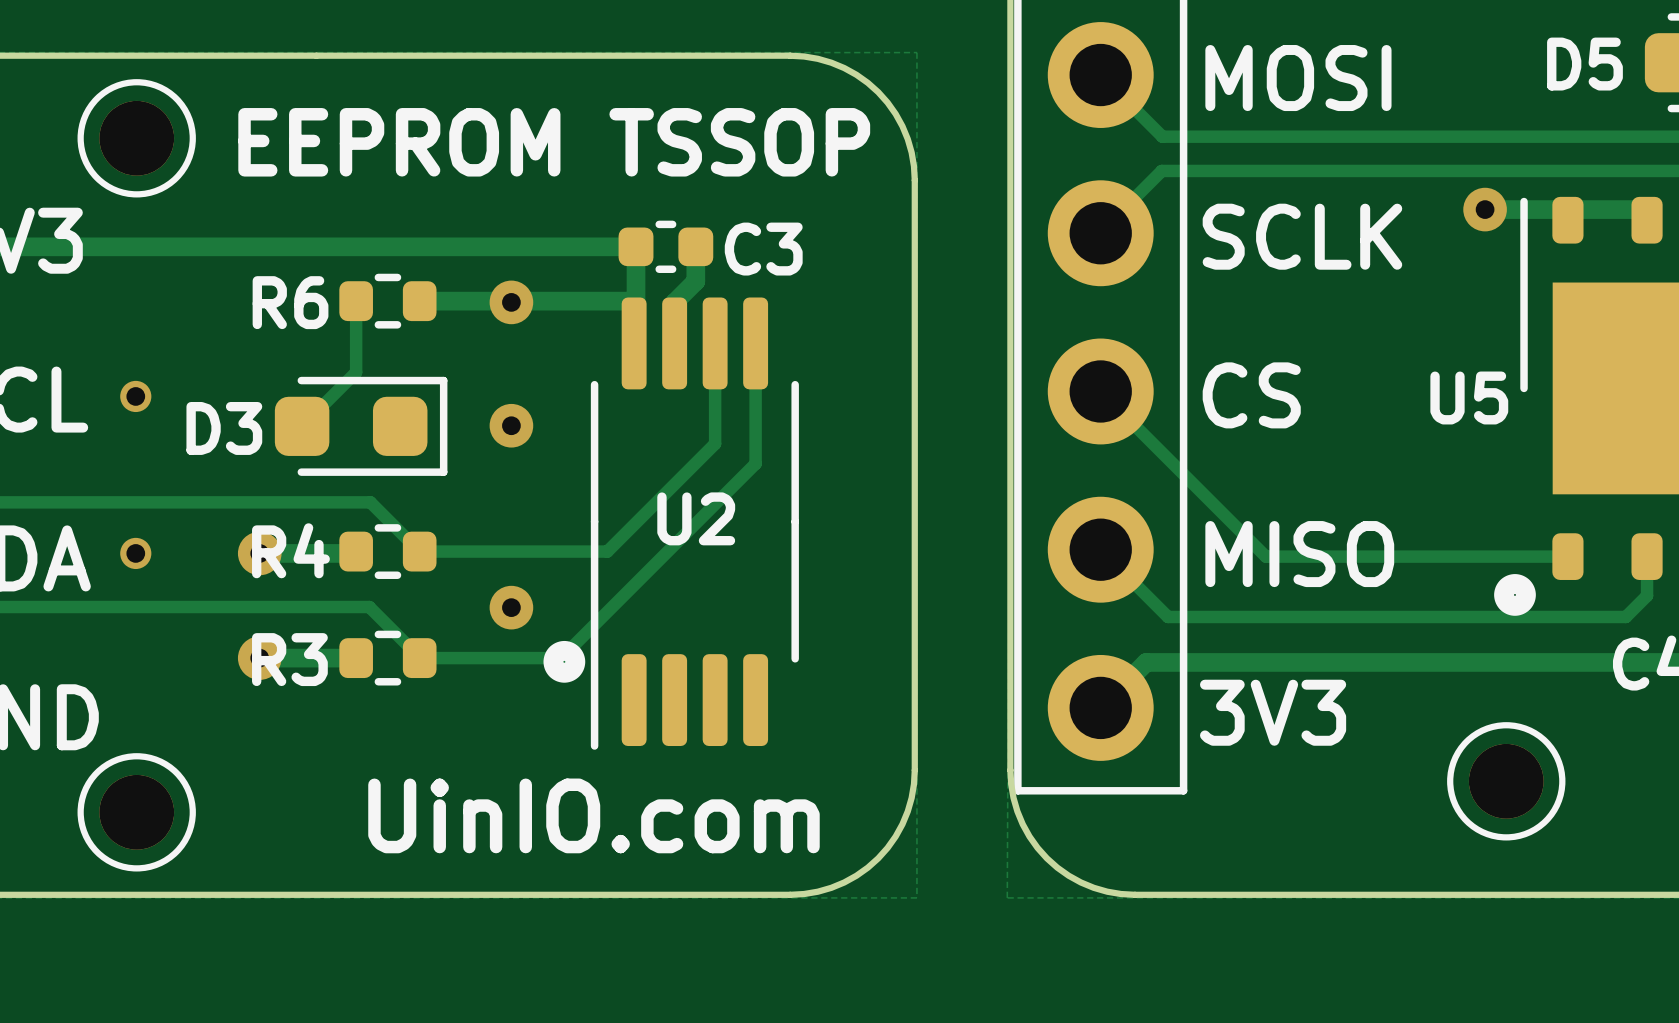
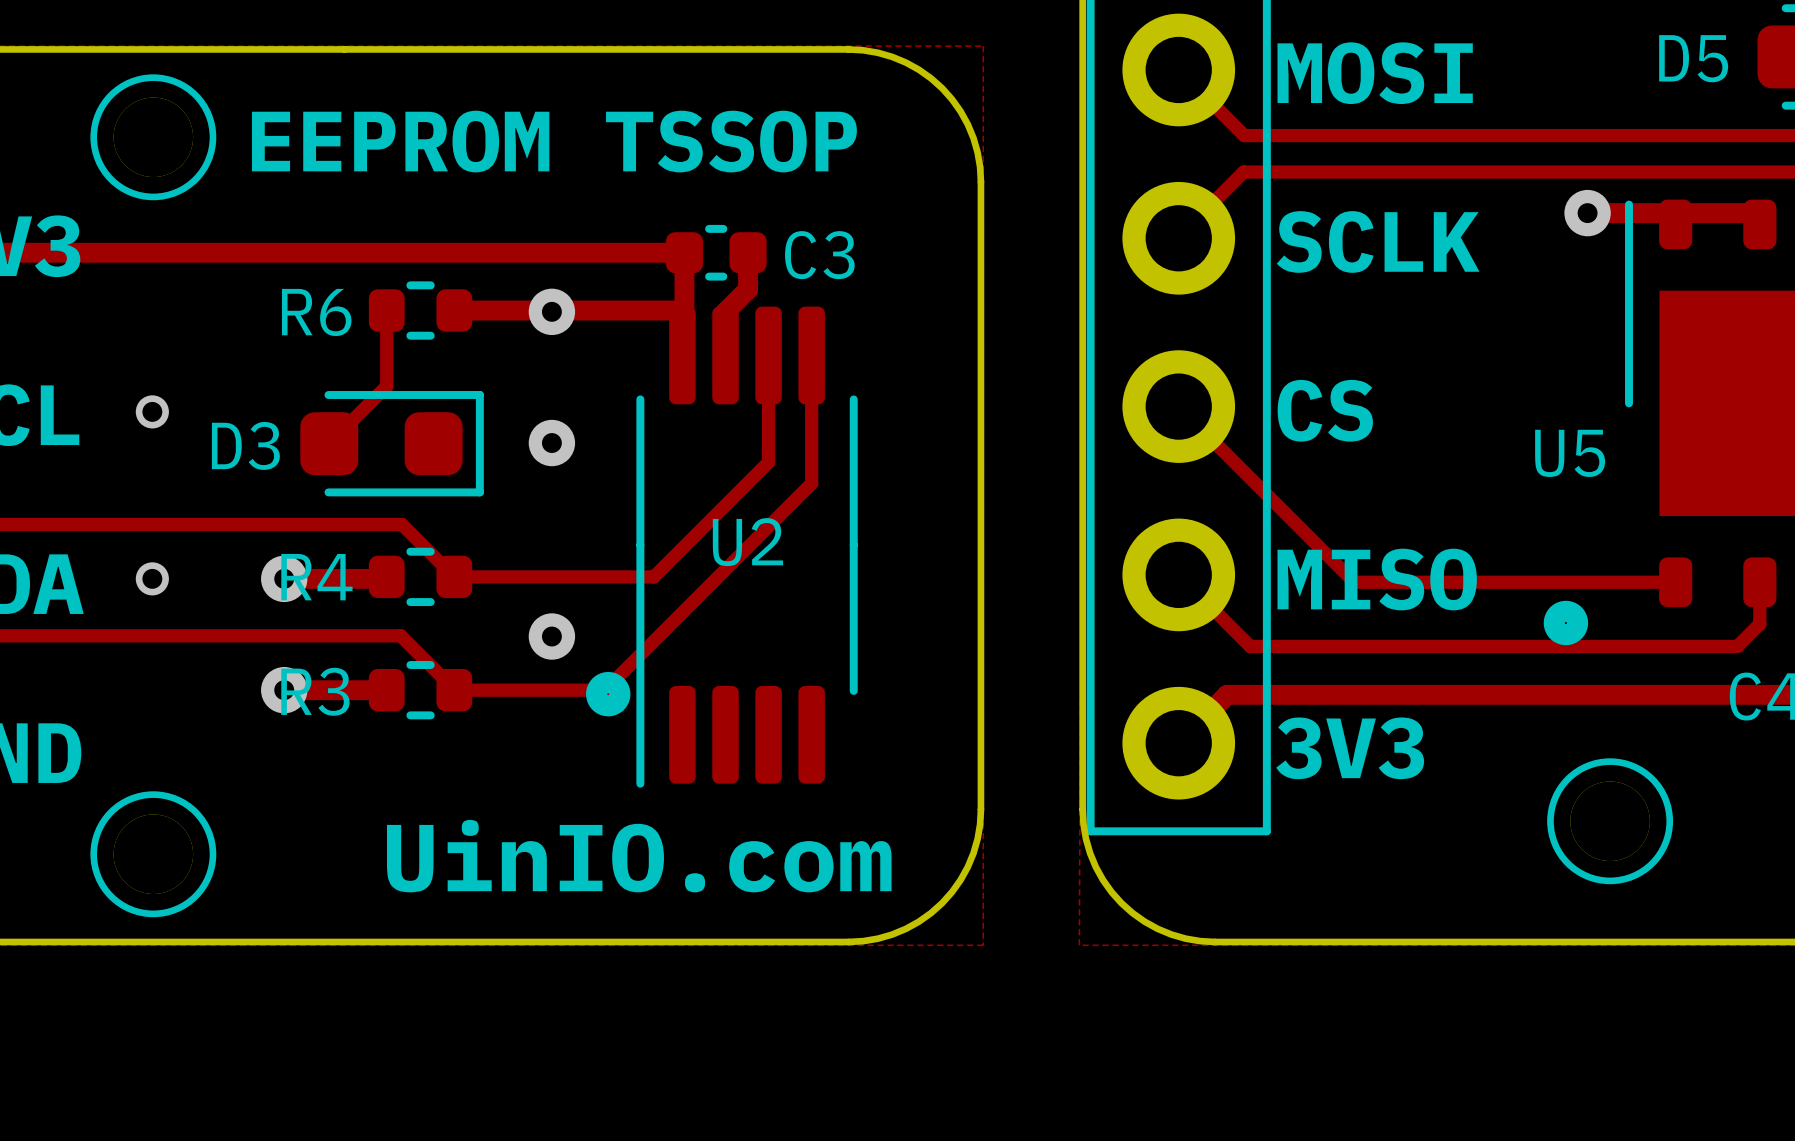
U5 name position: U5 (1469, 397) -> U5 (1570, 453)
drawing position: (1514, 594) -> (1565, 623)

